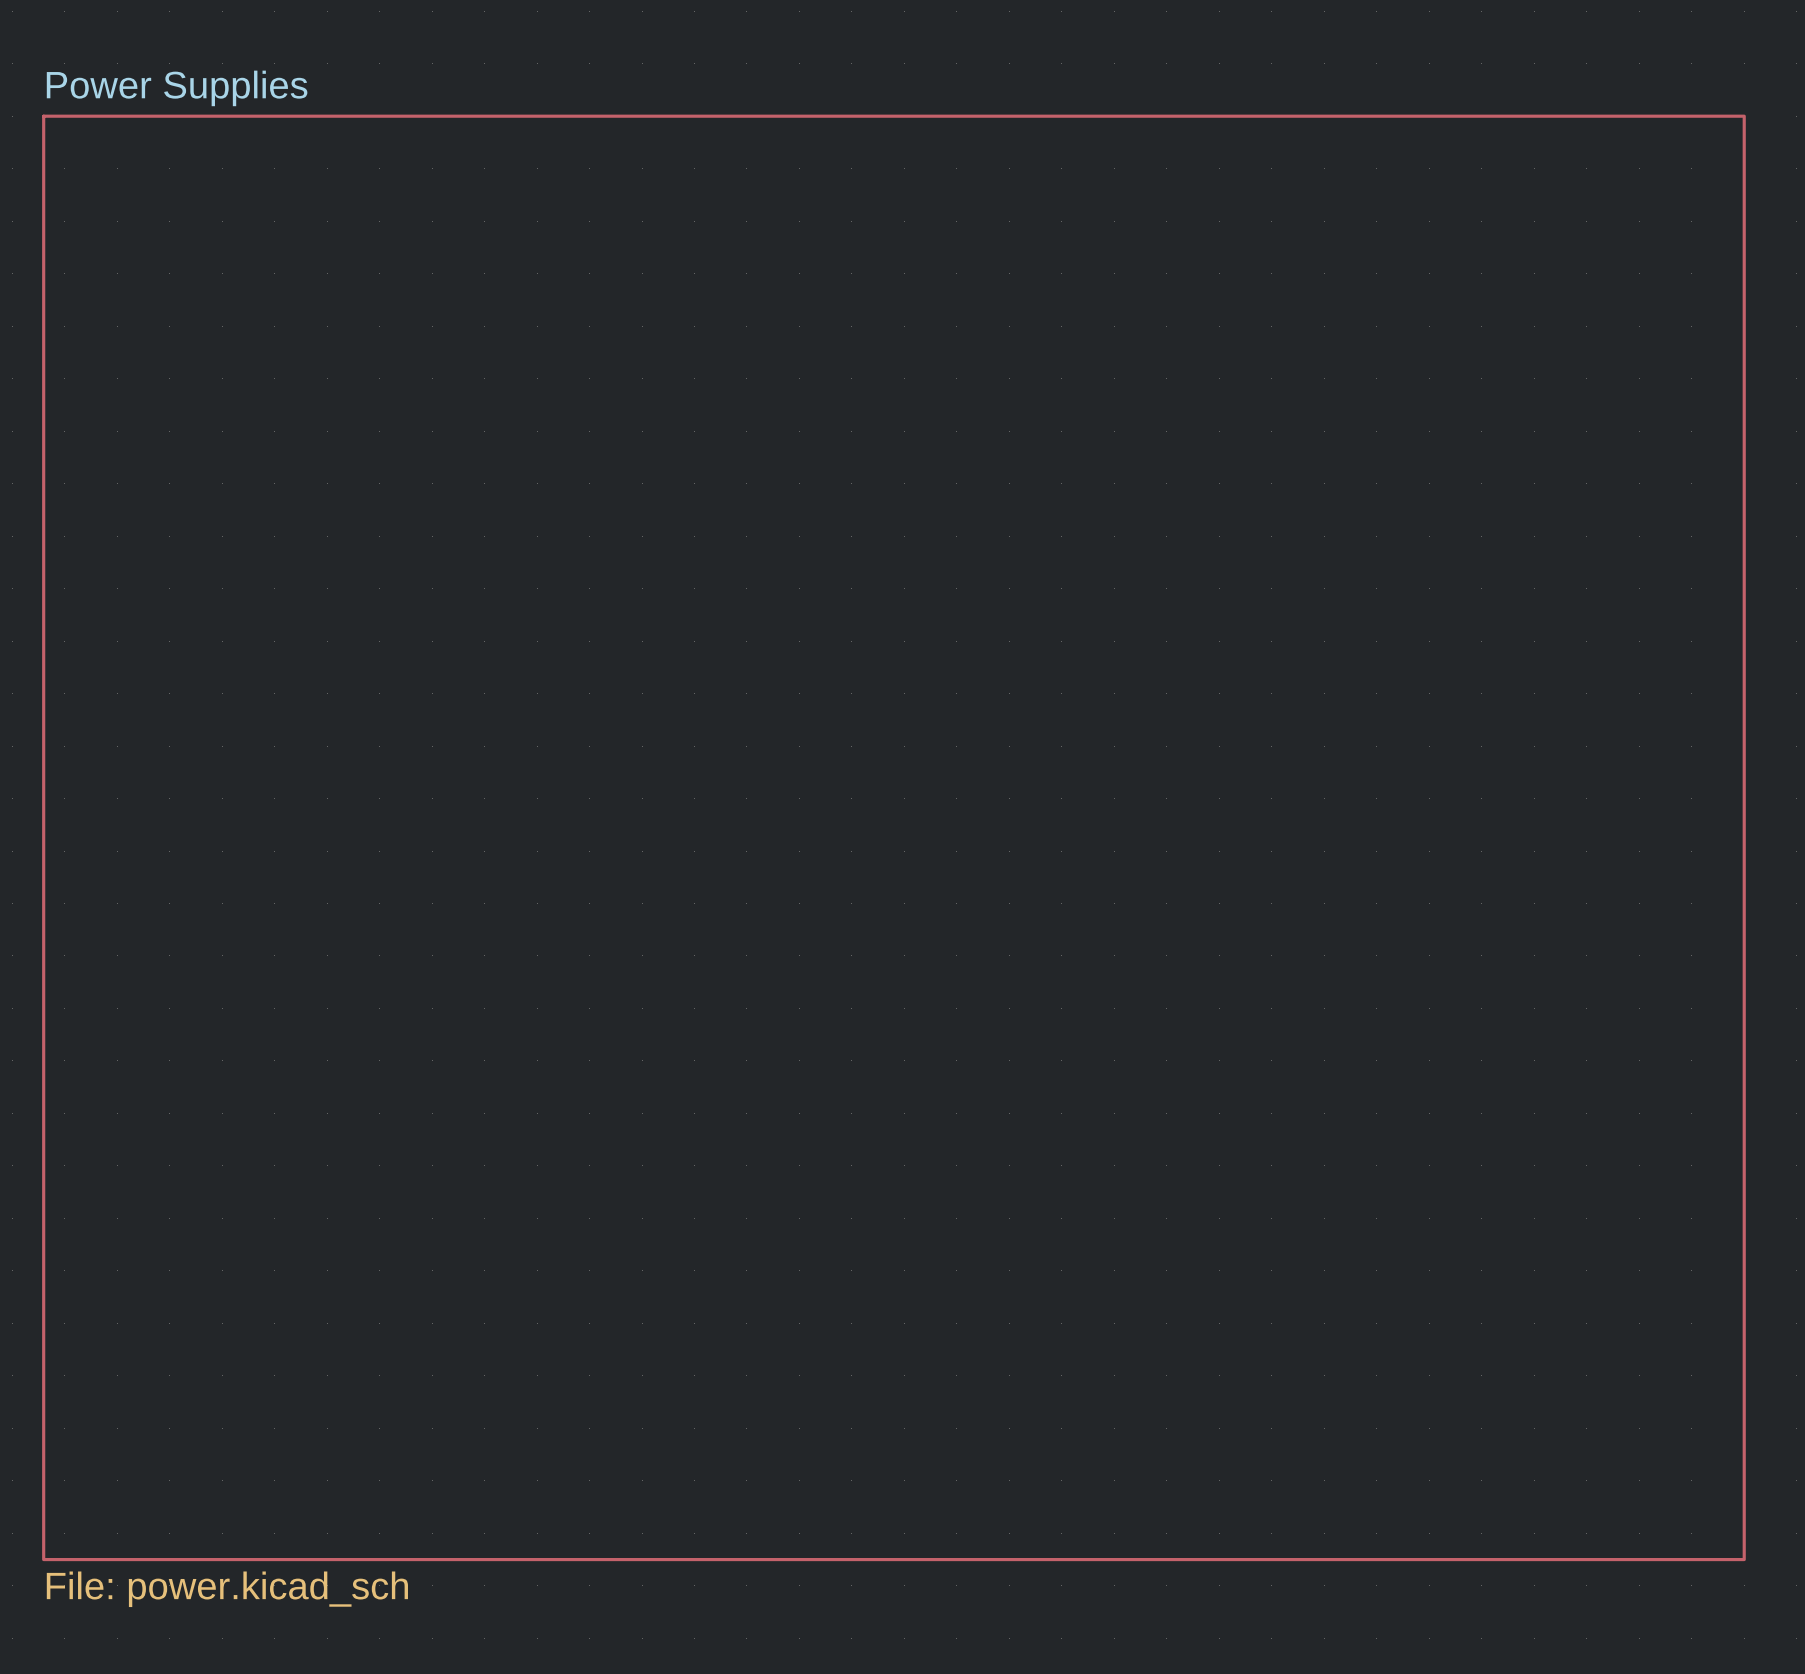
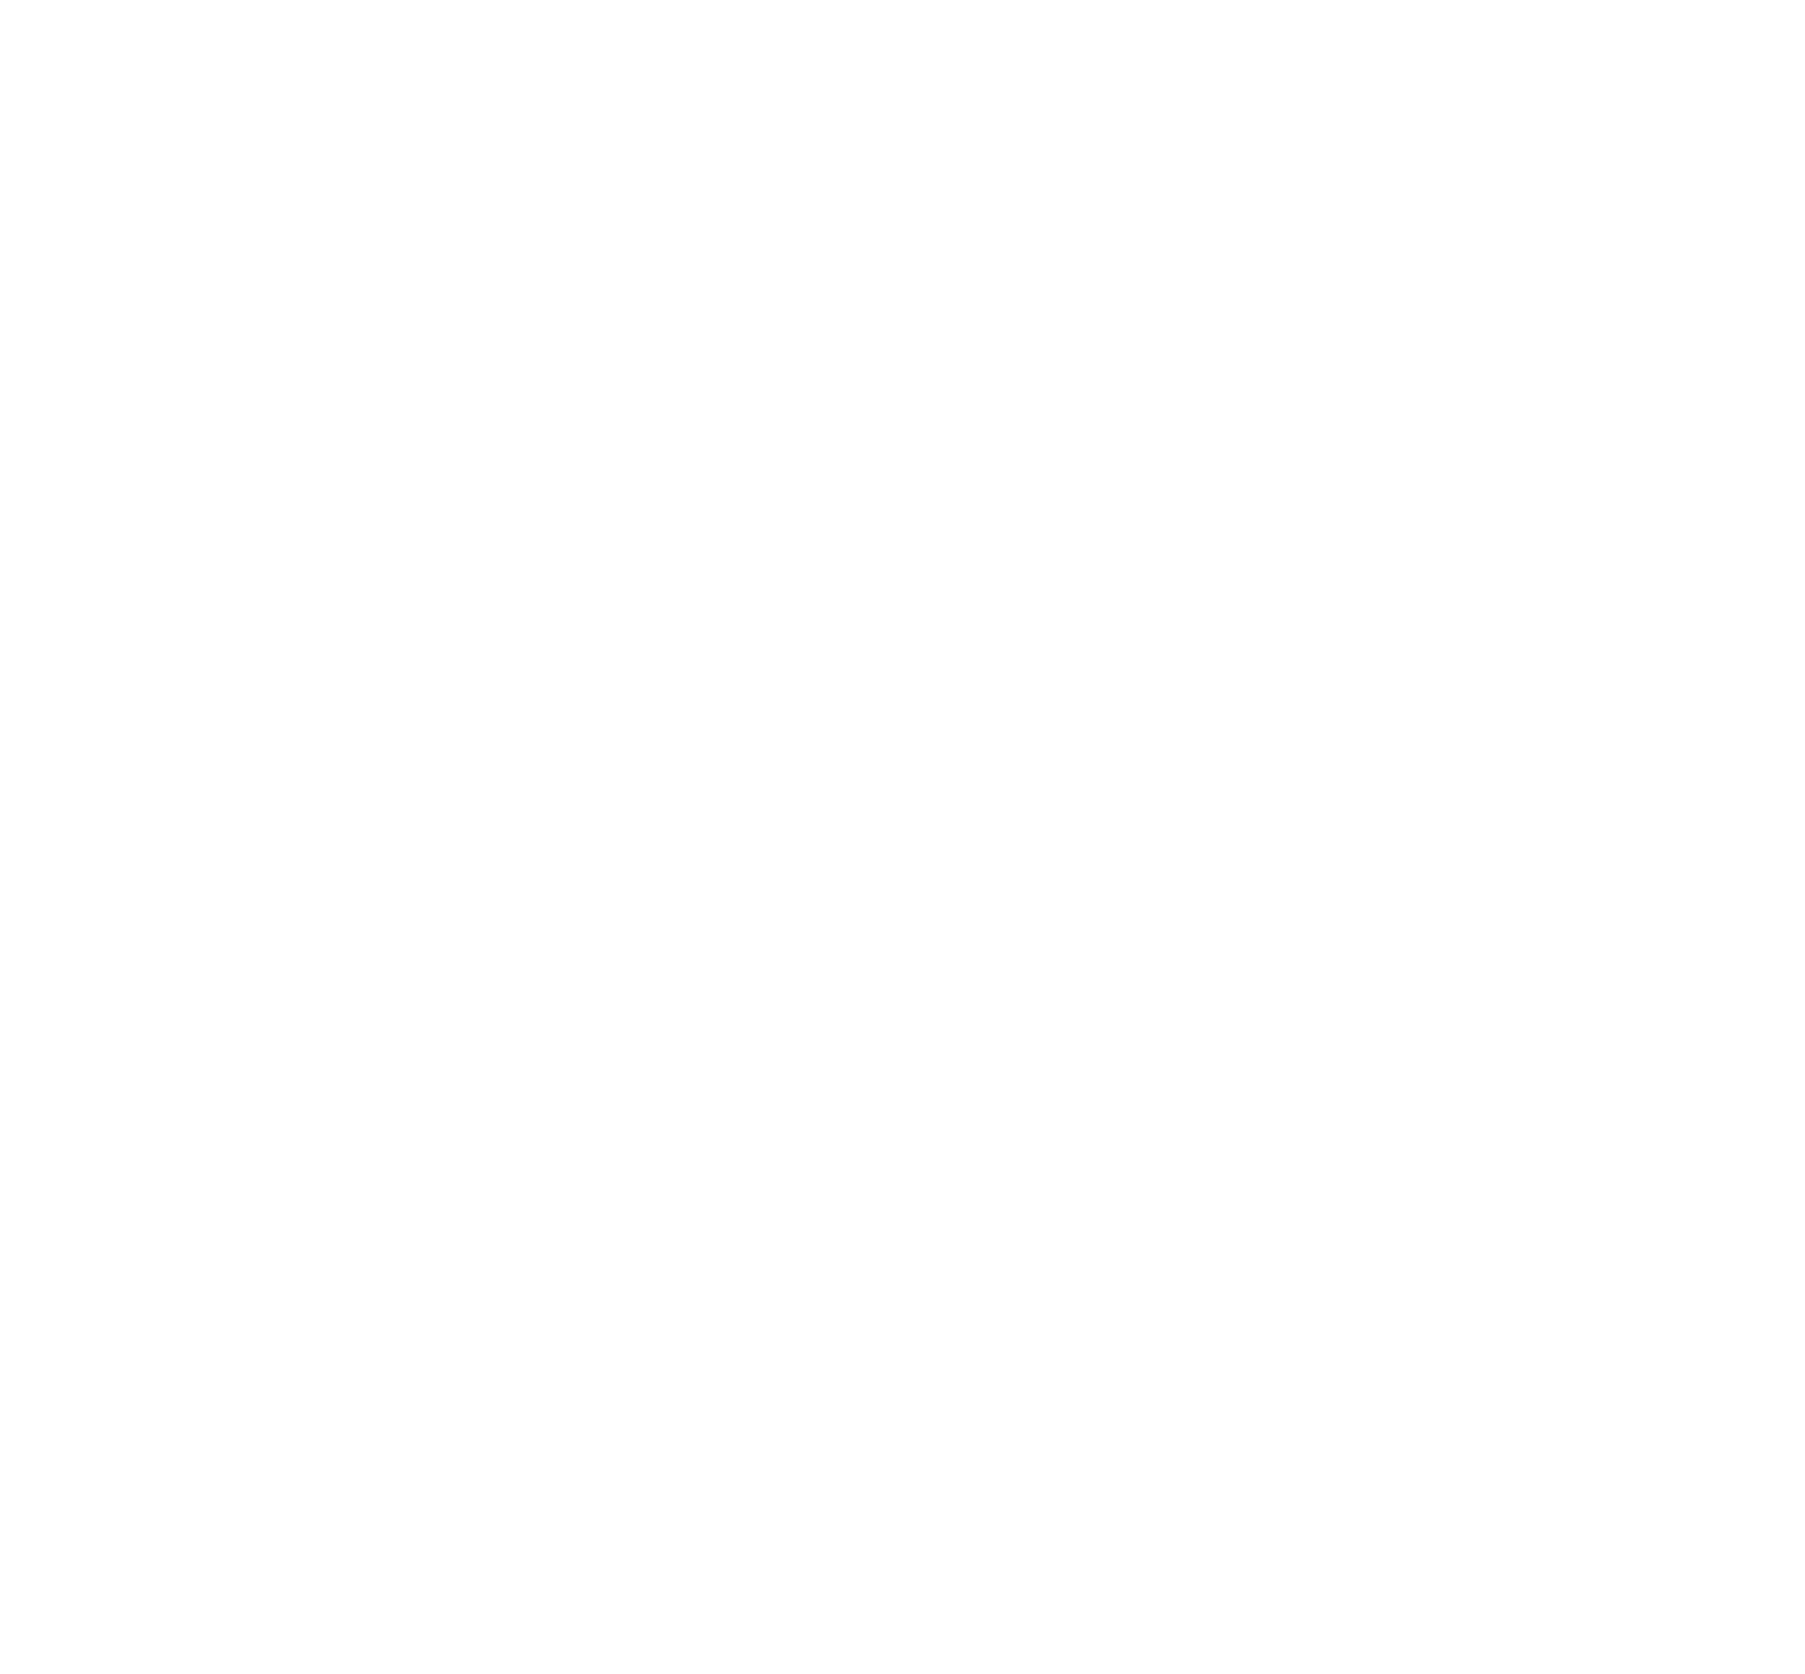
sheet Power Supplies: File: power.kicad_sch (893, 837) -> none

